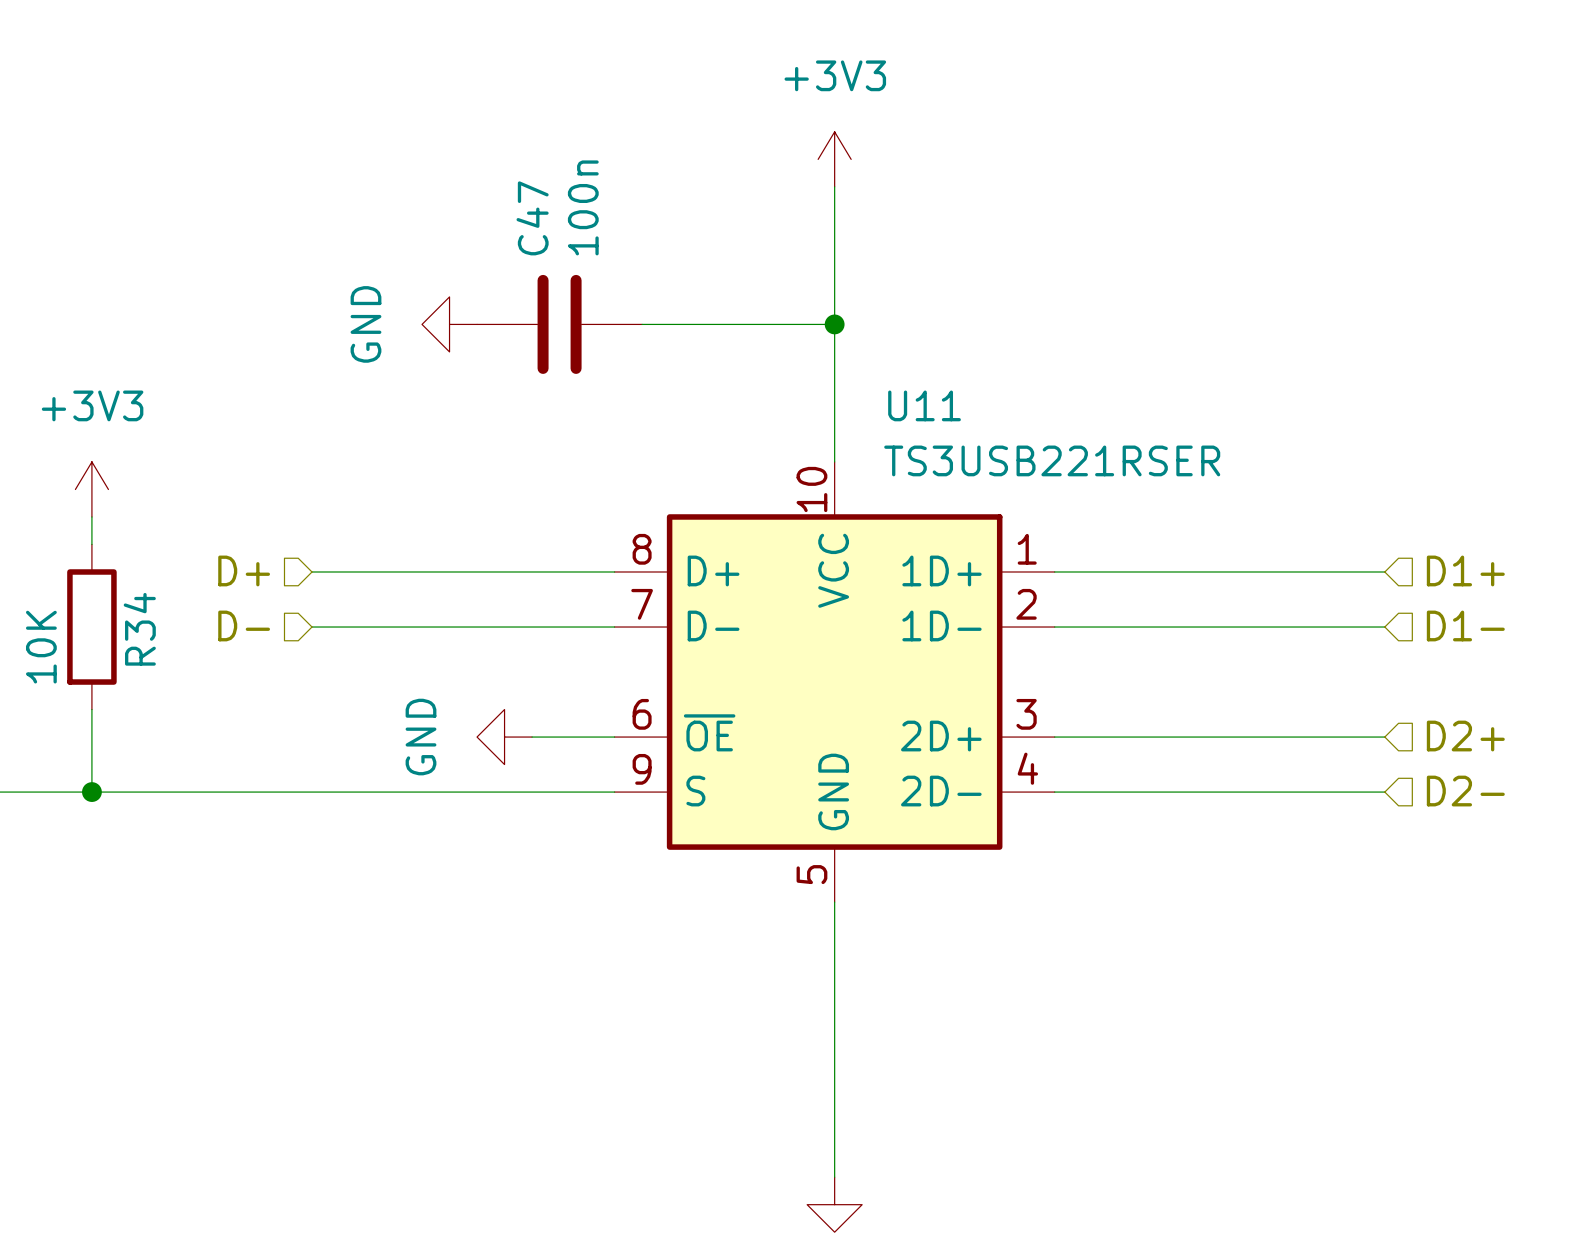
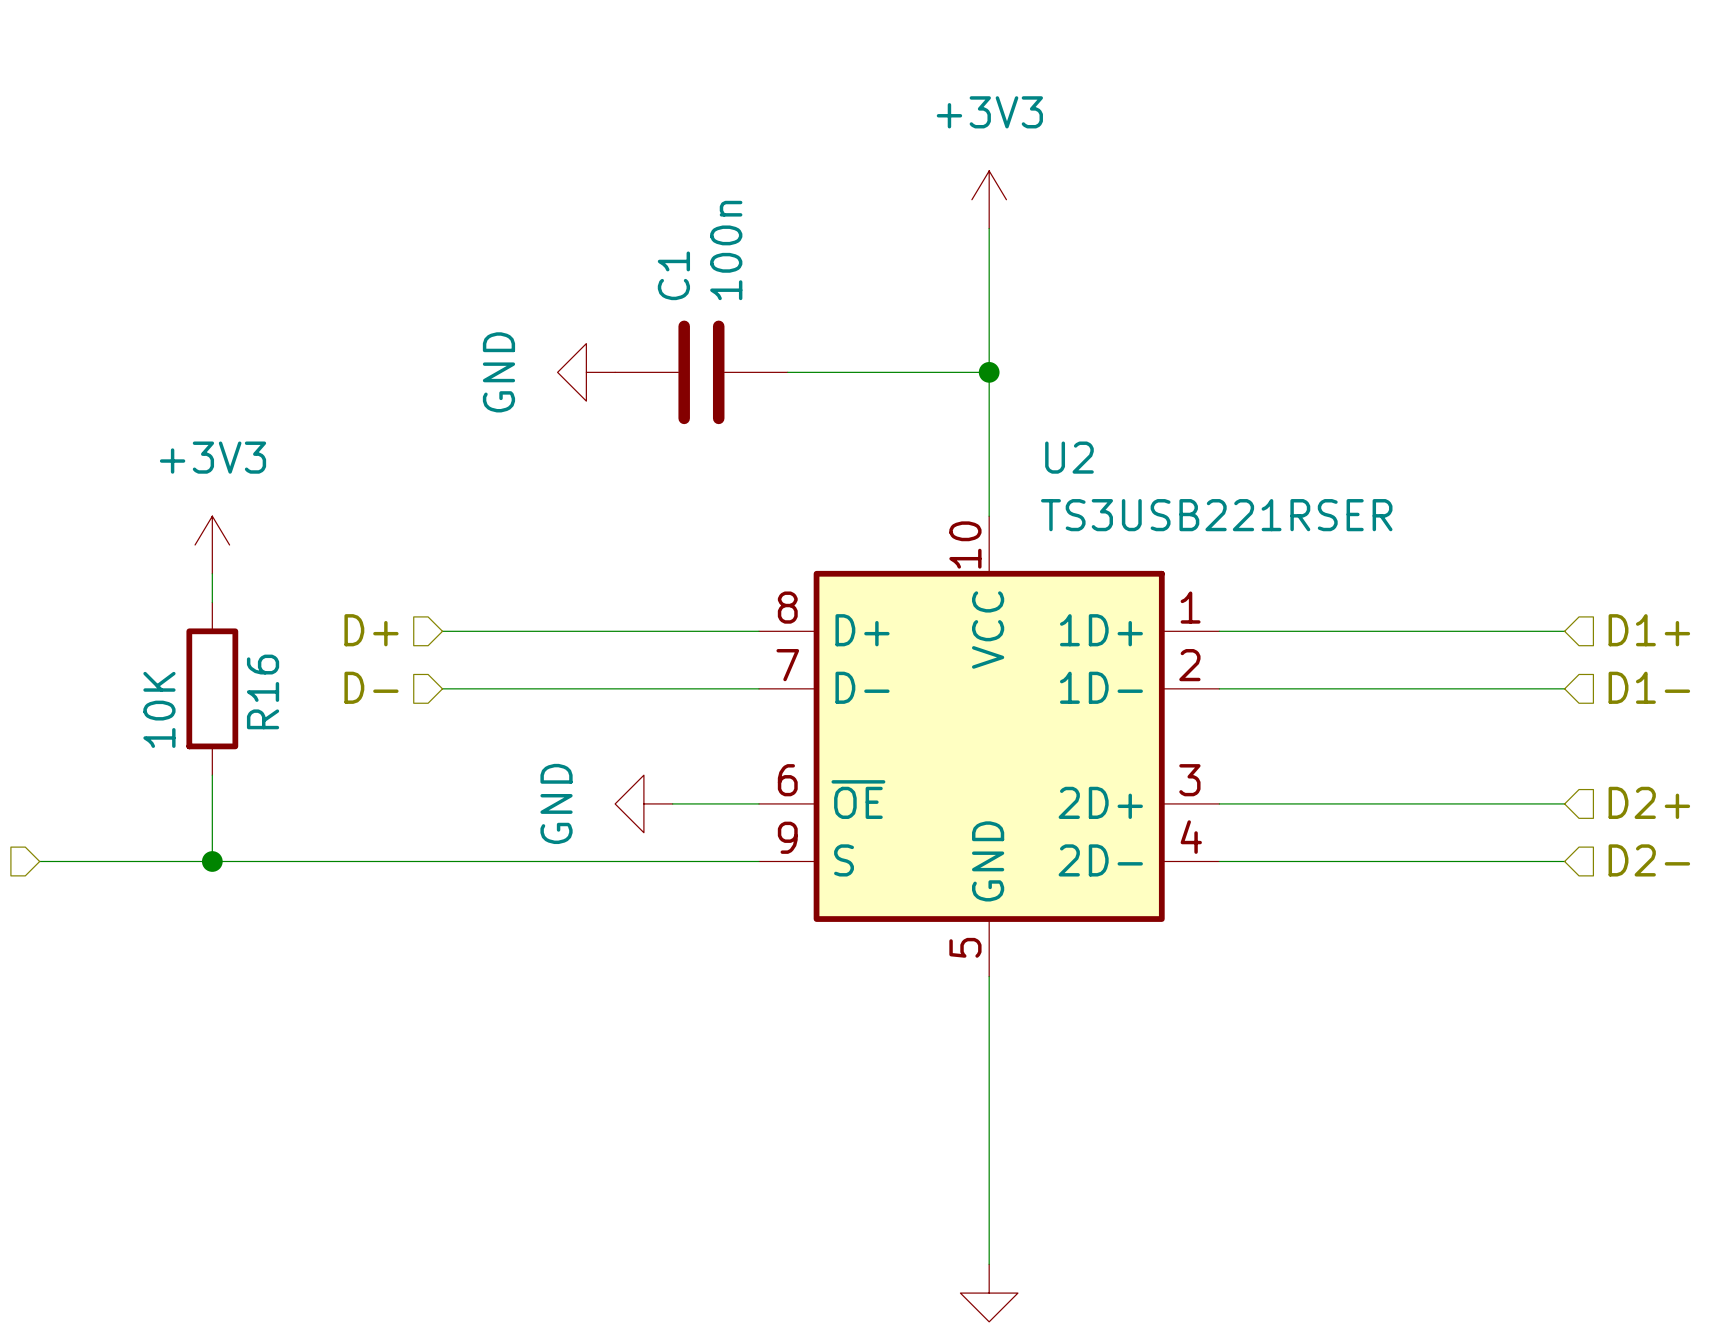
C47 name: C47 (532, 218) -> C1 (673, 275)
U11 name: U11 (924, 405) -> U2 (1069, 457)
R34 name: R34 (139, 629) -> R16 (263, 691)

